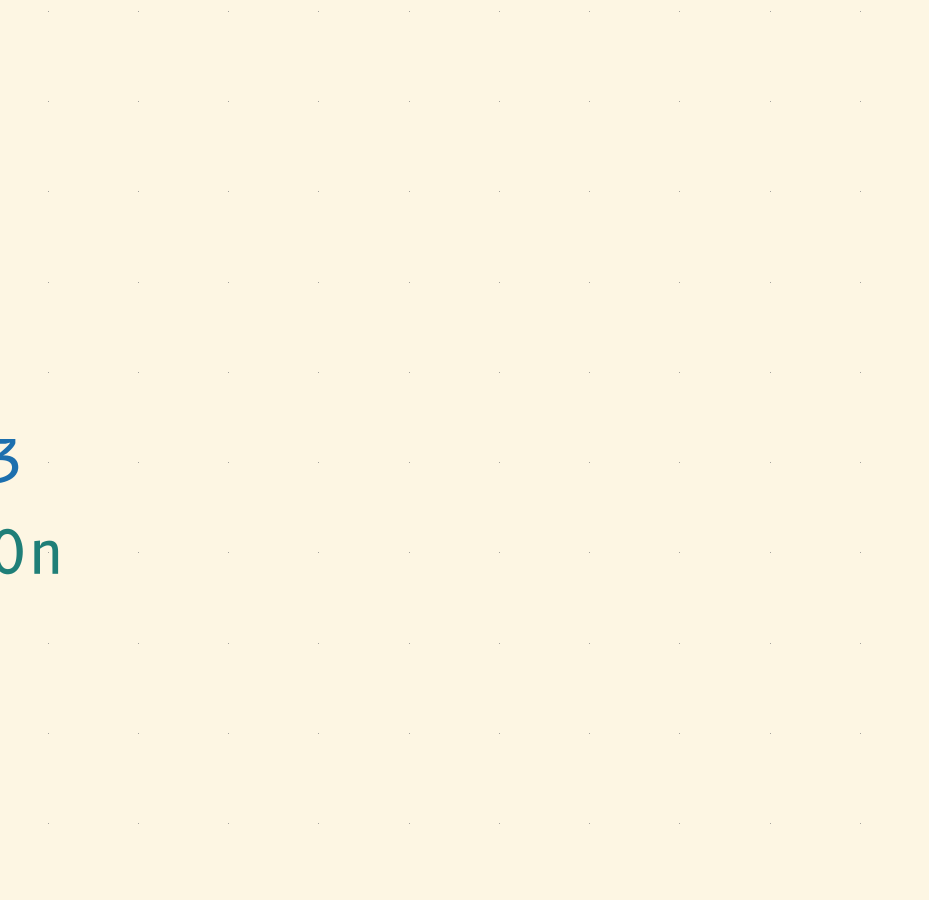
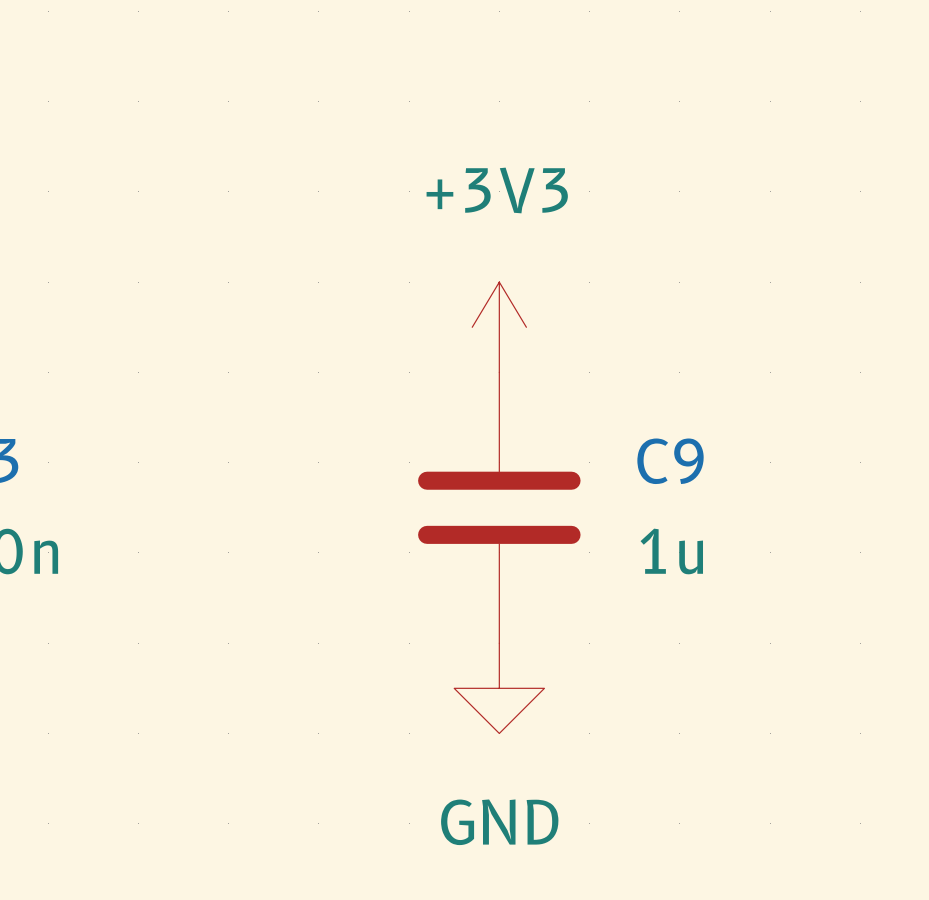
power symbol: none -> +3V3 (499, 327)
C9: none -> 1u (499, 507)
power symbol: none -> GND (499, 688)

